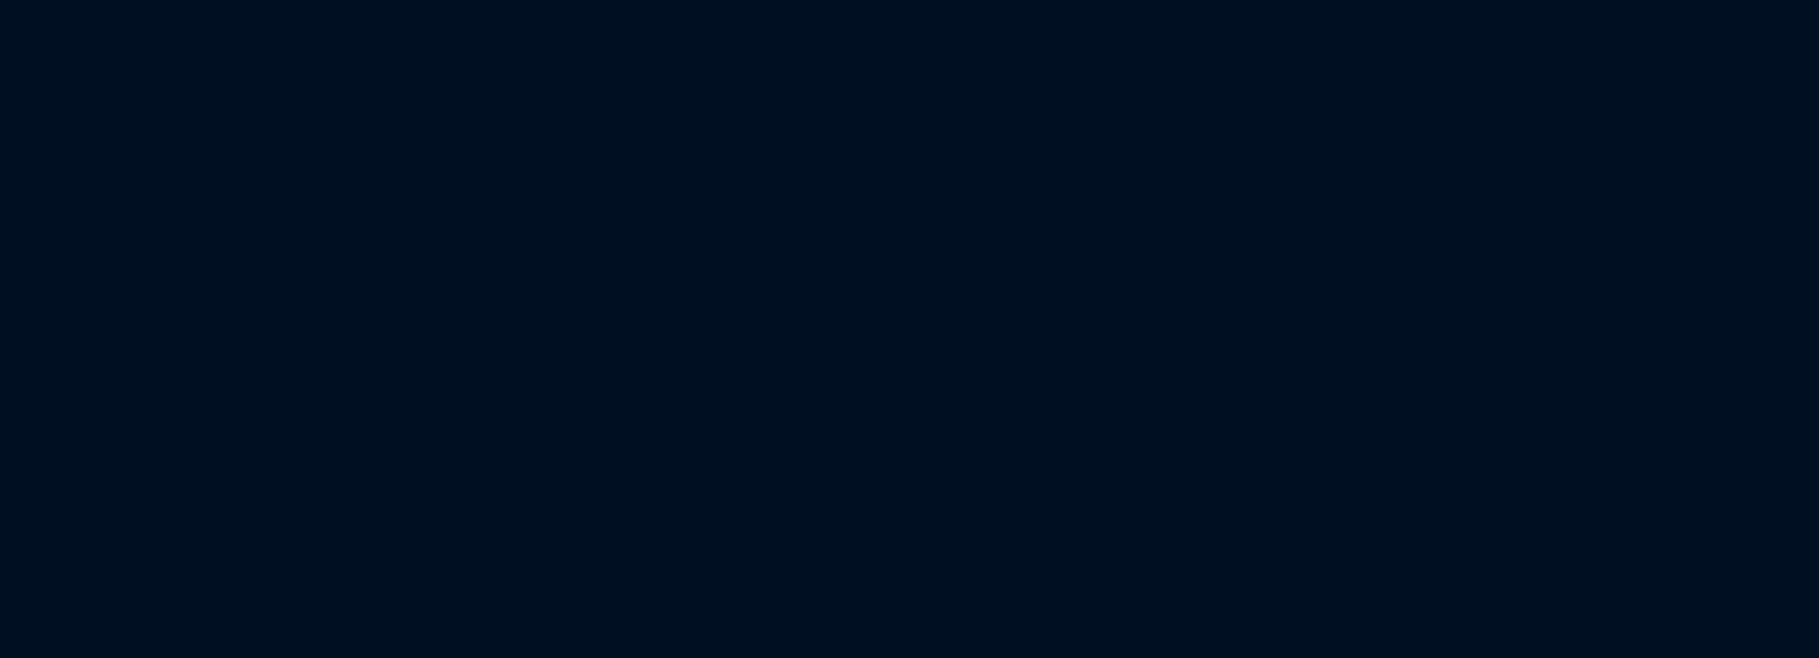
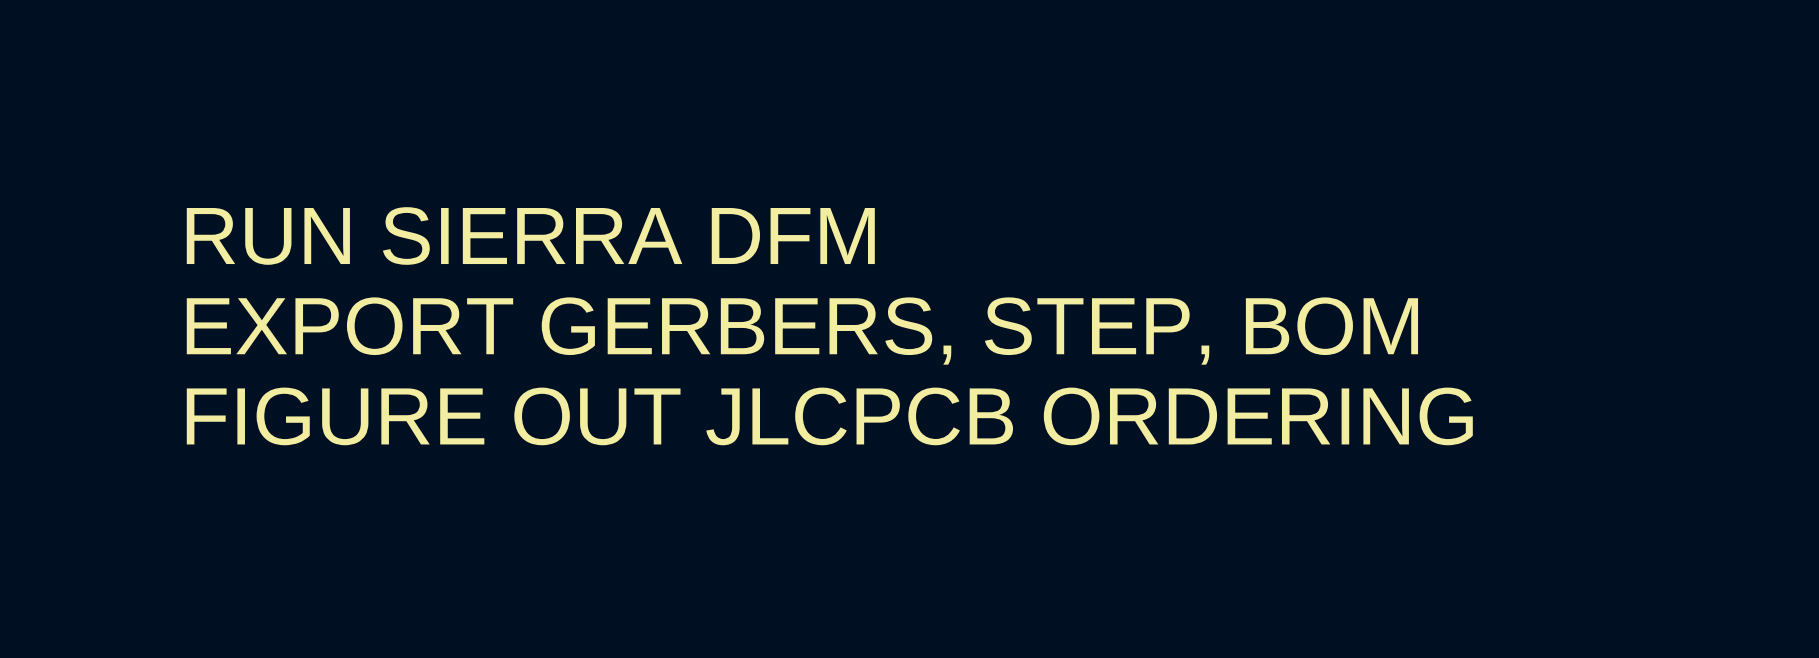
text: none -> RUN SIERRA DFM (530, 235)
text: none -> EXPORT GERBERS, STEP, BOM (802, 331)
text: none -> FIGURE OUT JLCPCB ORDERING (829, 416)

